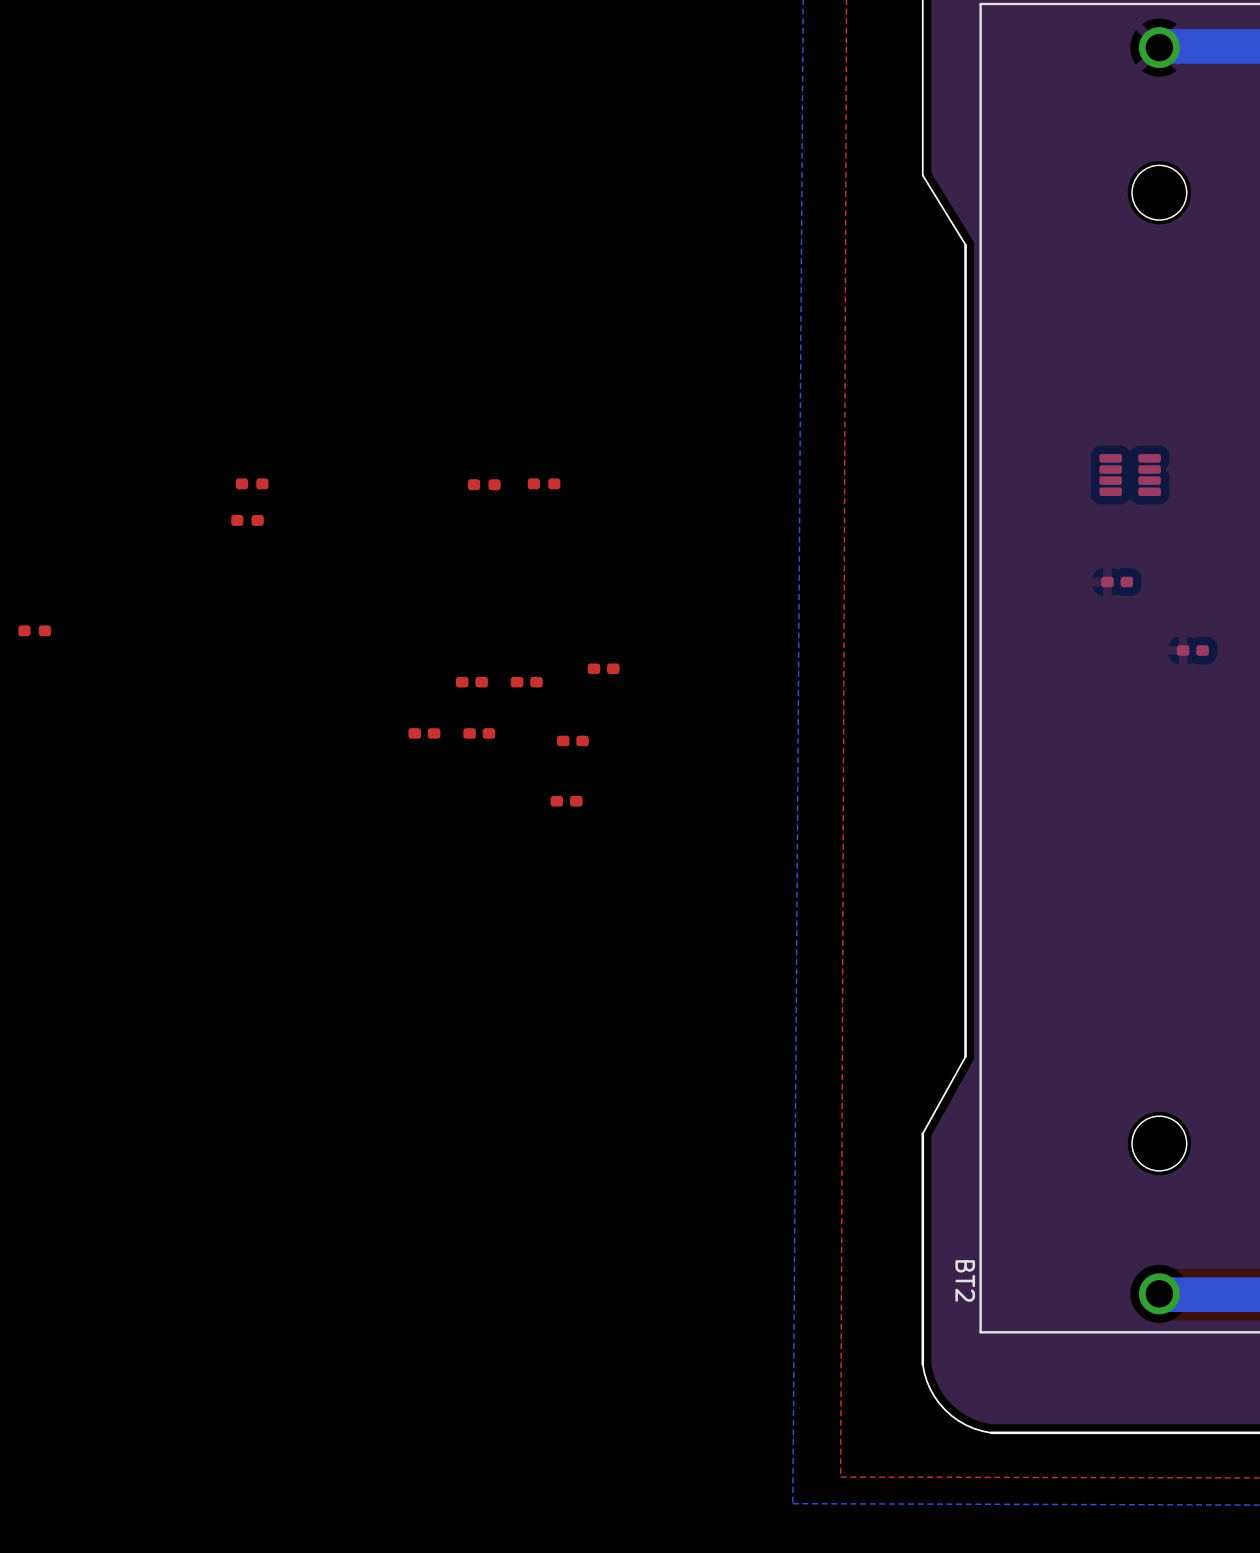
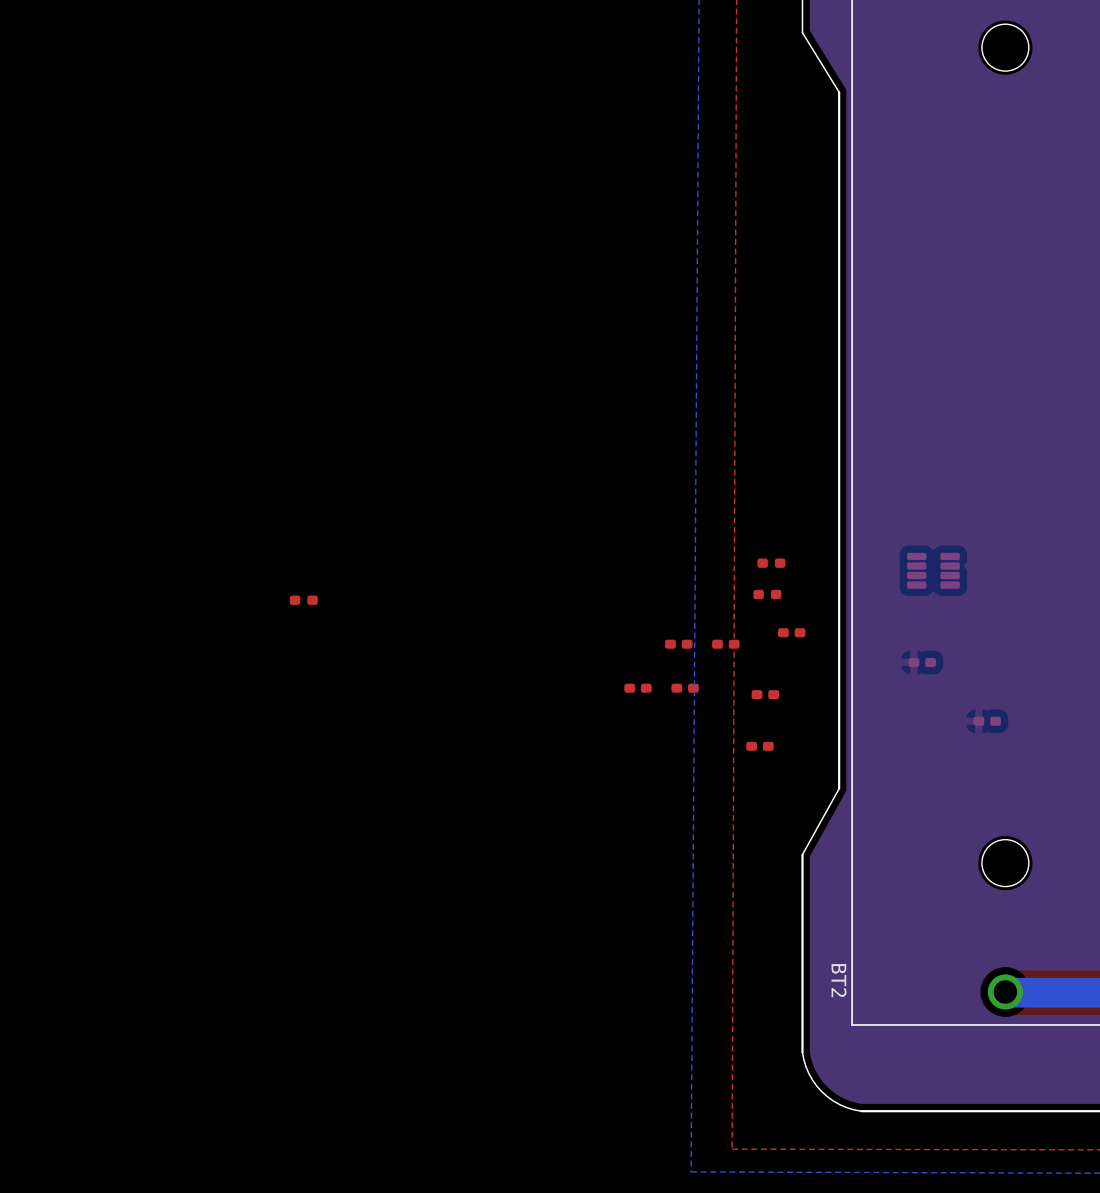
part position: (1130, 475) -> (933, 570)
part: (252, 483) -> none
part: (544, 483) -> none
part: (484, 484) -> none
part: (247, 520) -> none
part: (1117, 581) -> none
part: (34, 630) -> none
part: (1192, 650) -> none
part: (603, 668) -> none
part: (471, 682) -> none
part: (526, 682) -> none
part: (424, 733) -> none
part: (479, 733) -> none
part: (572, 740) -> none
part: none -> (771, 563)
part: (566, 801) -> none
part: none -> (767, 594)
part: none -> (303, 600)
part: none -> (791, 632)
part: none -> (678, 644)
part: none -> (725, 644)
part: none -> (922, 662)
part: none -> (638, 688)
part: none -> (685, 688)
part: none -> (765, 694)
part: none -> (987, 721)
part: none -> (759, 746)

